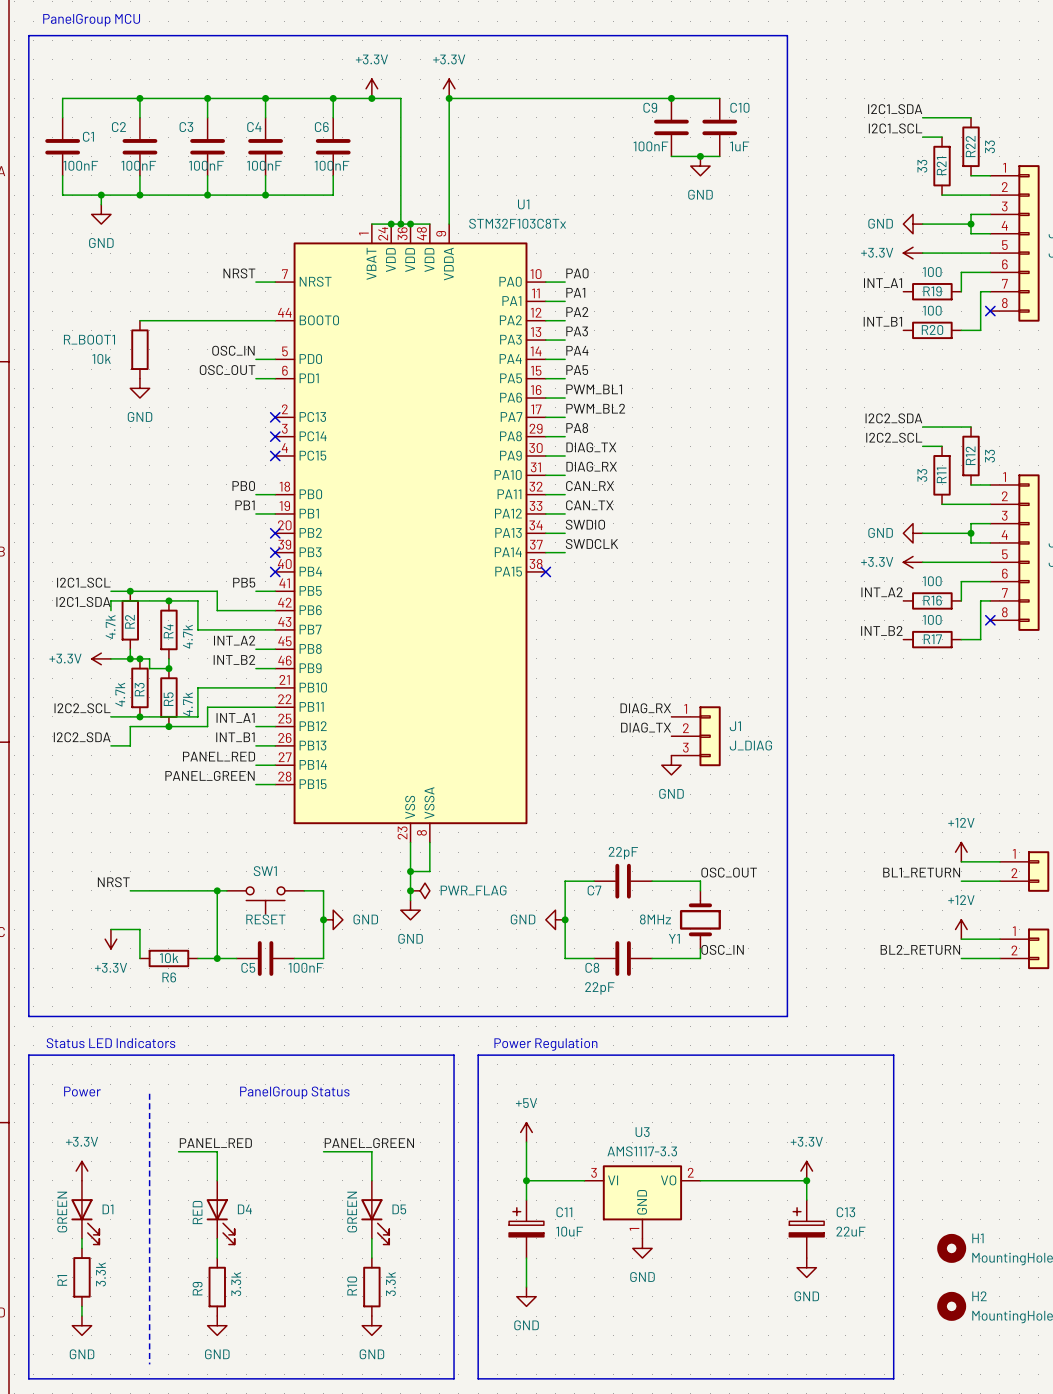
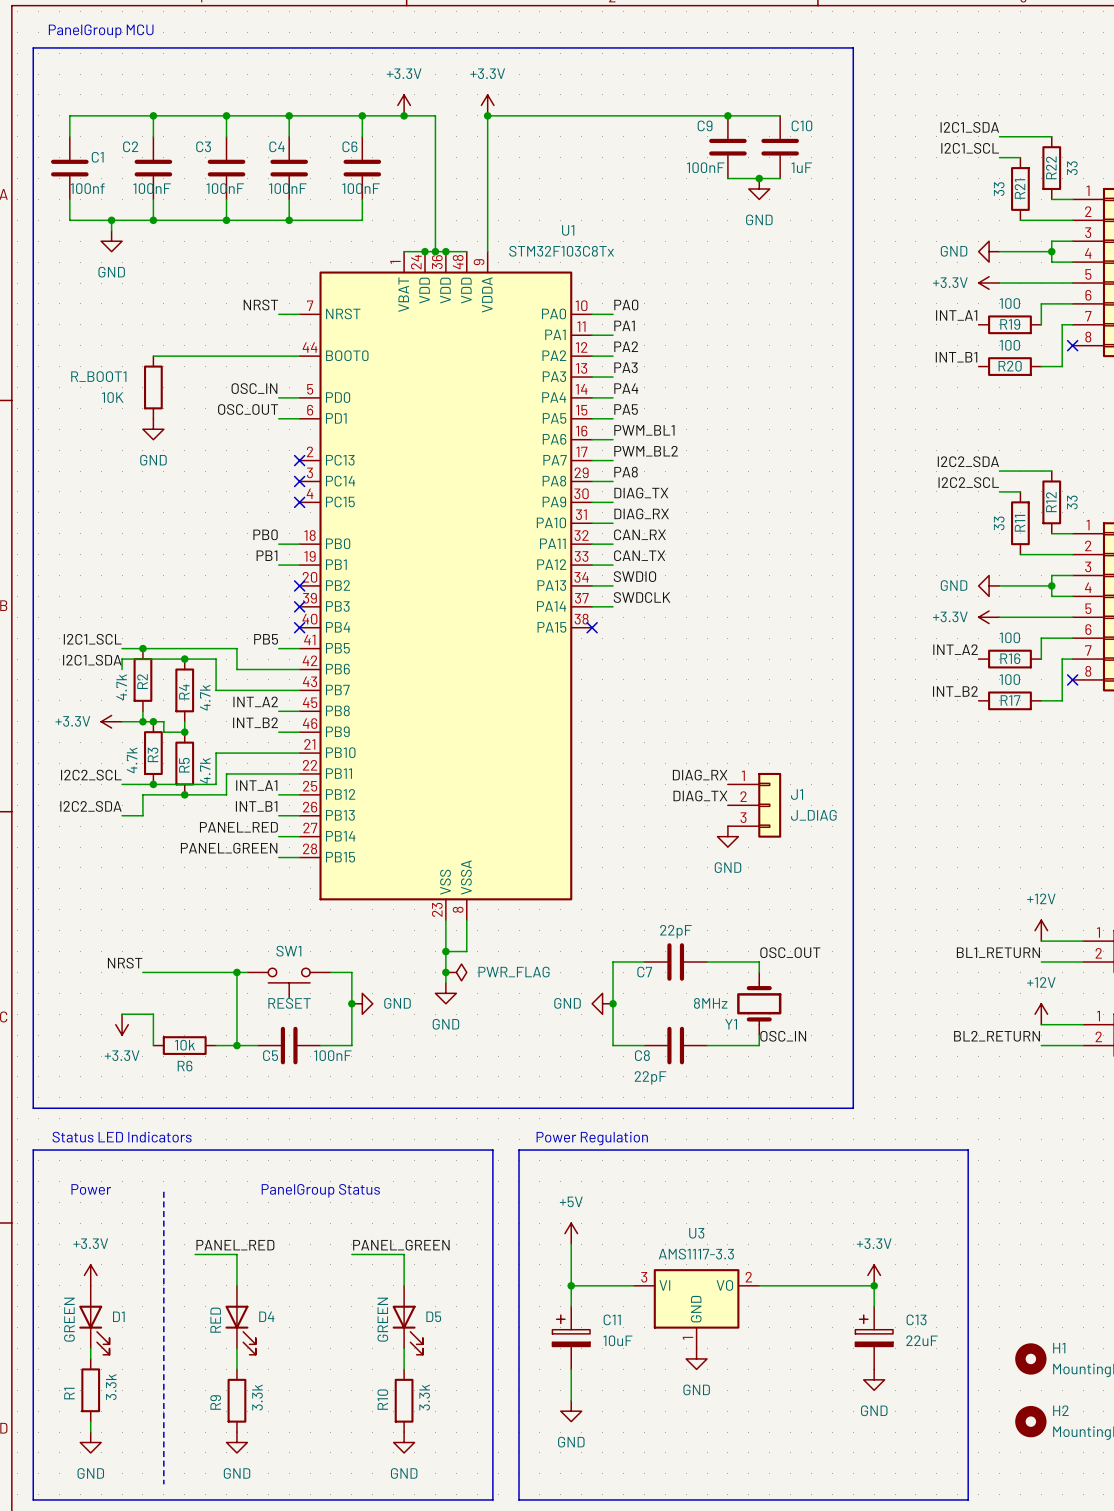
C1 value: 100nF (80, 165) -> 100nf (87, 188)
R_BOOT1 value: 10k (101, 359) -> 10K (112, 397)

